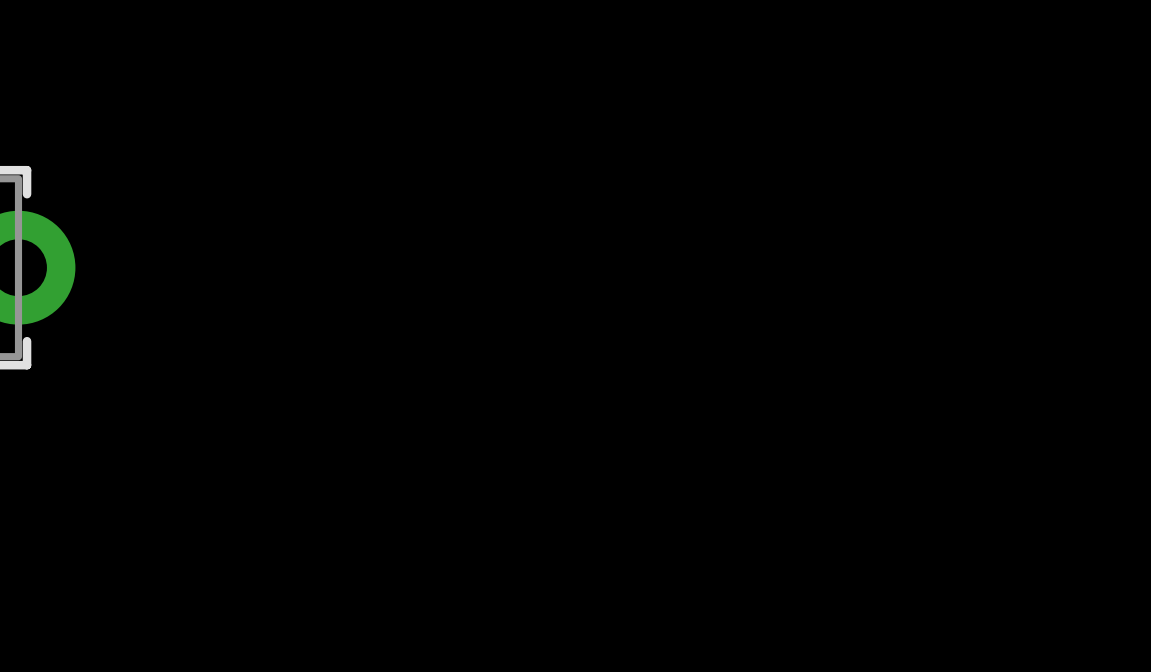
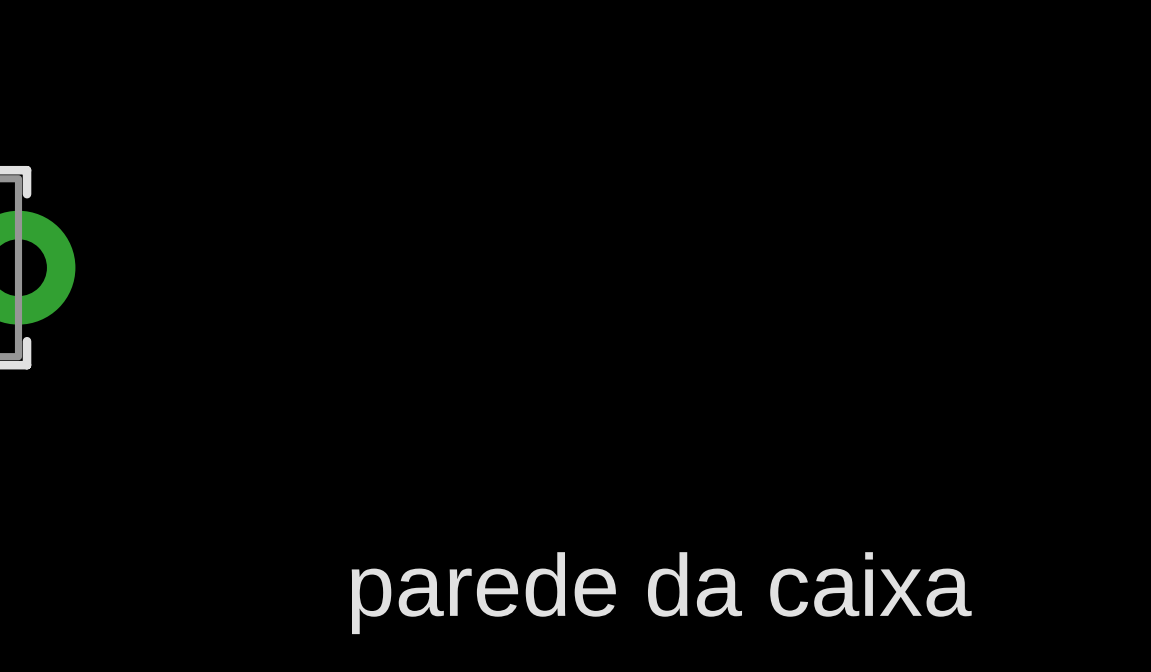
text: none -> parede da caixa (661, 593)

